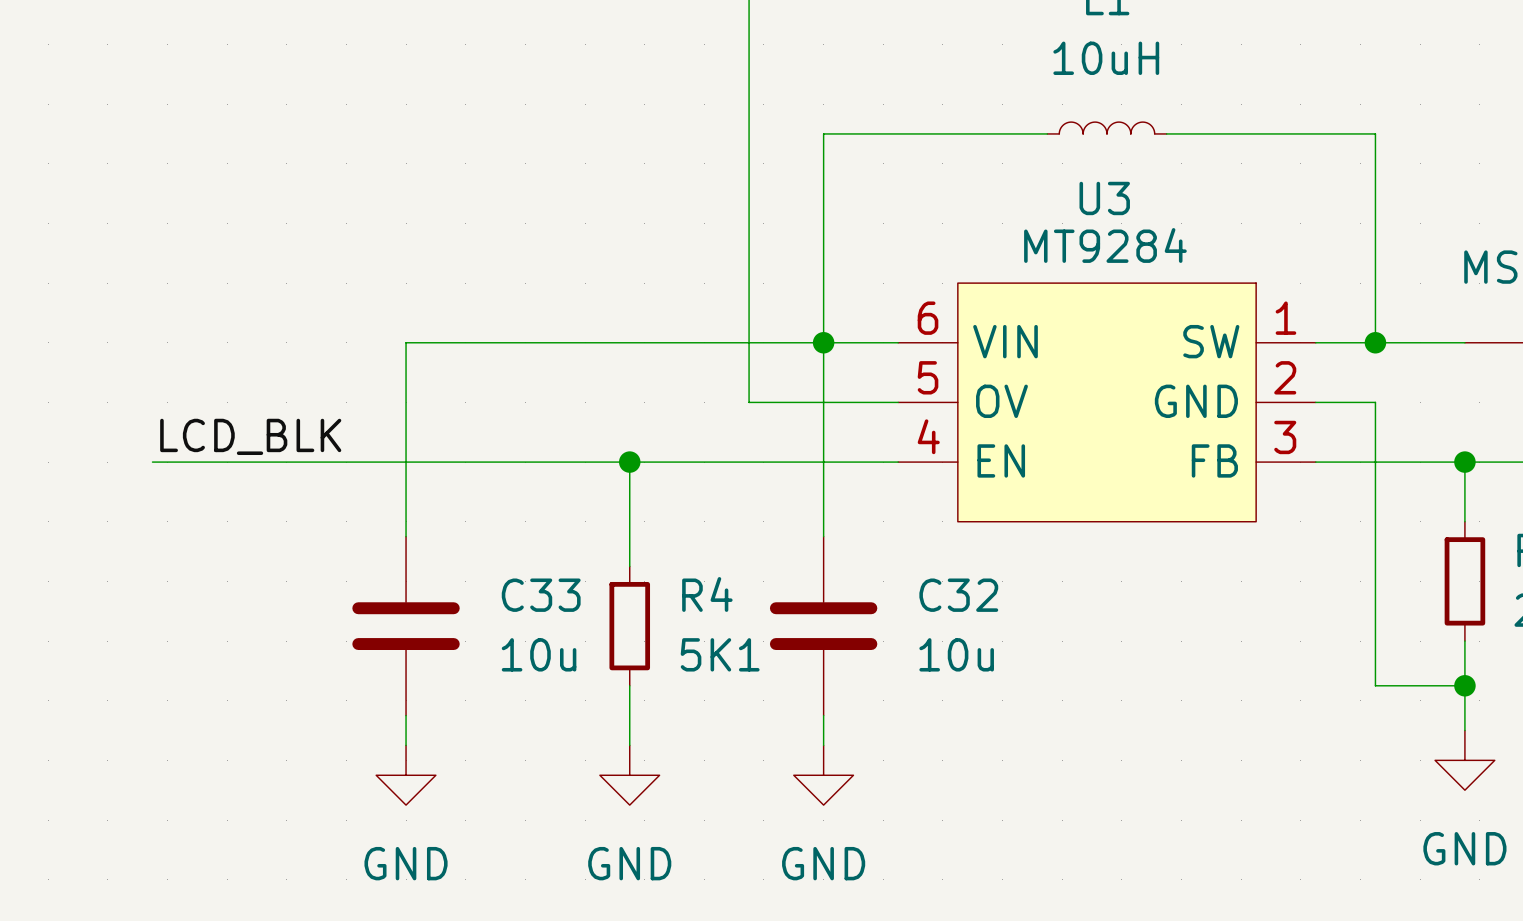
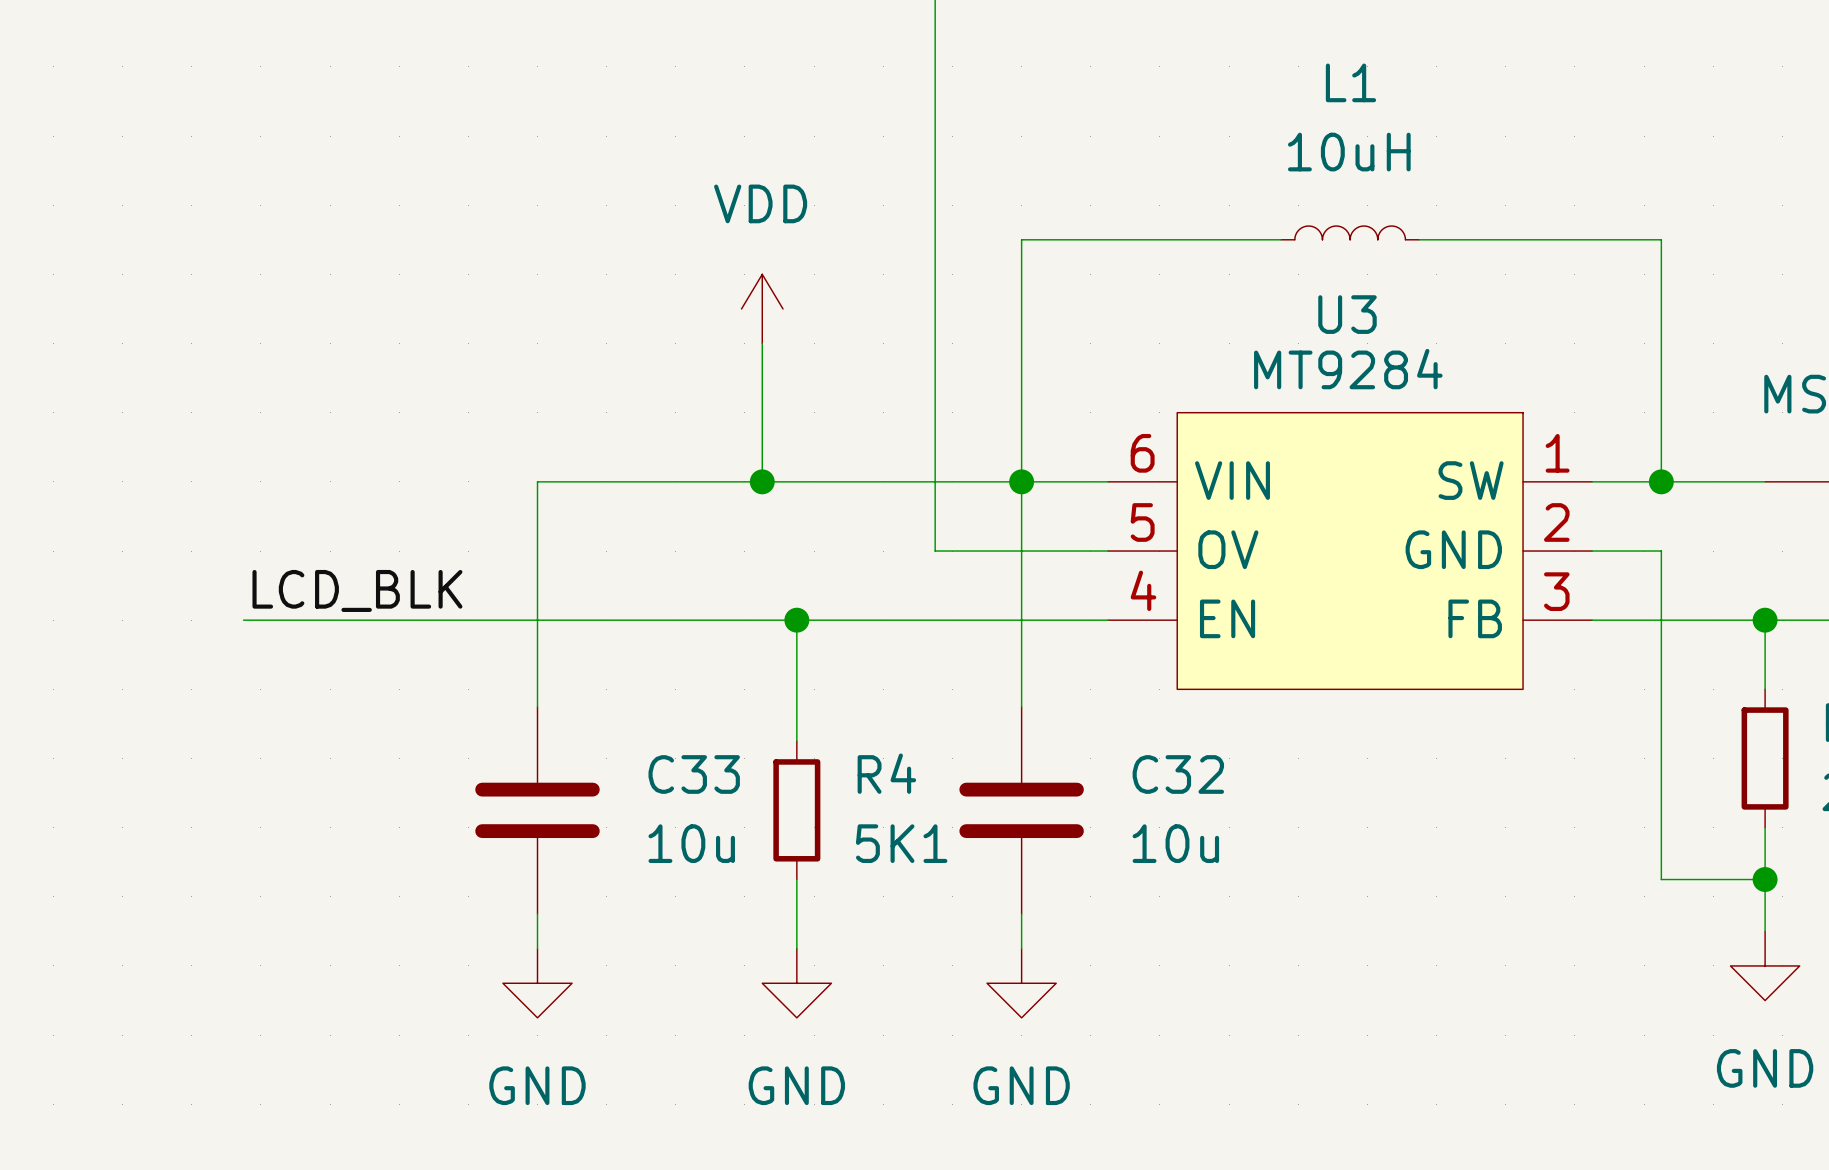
power symbol: none -> VDD (762, 308)
wire: none -> (762, 343) (762, 481)
junction: none -> (762, 481)

